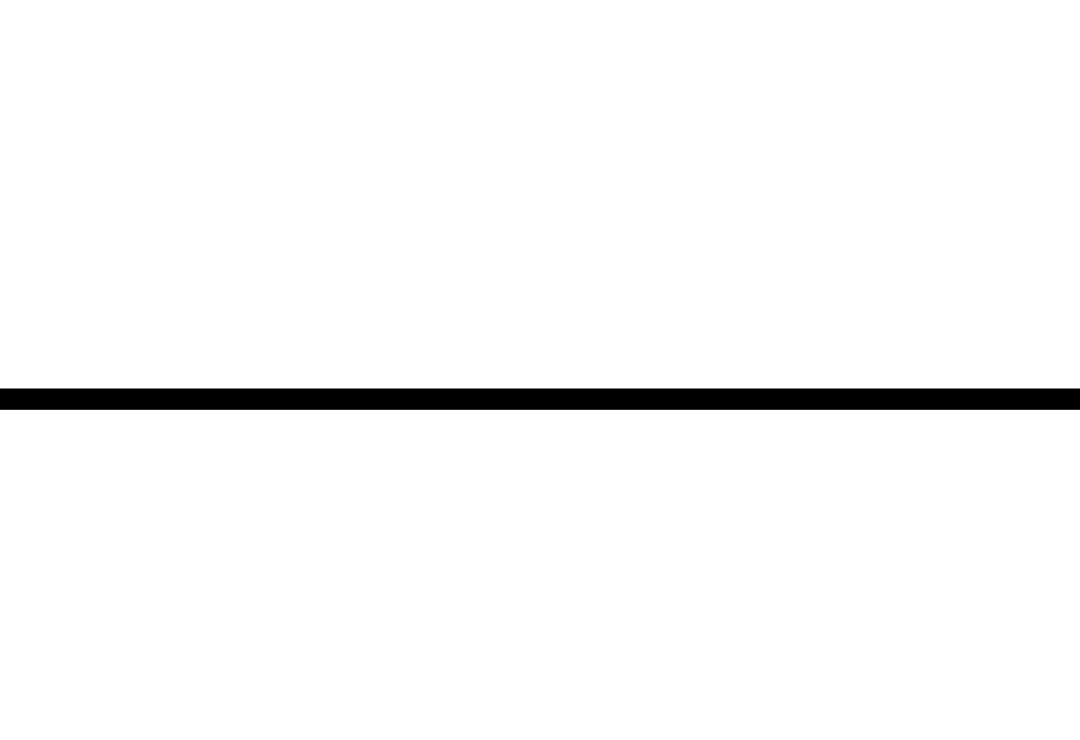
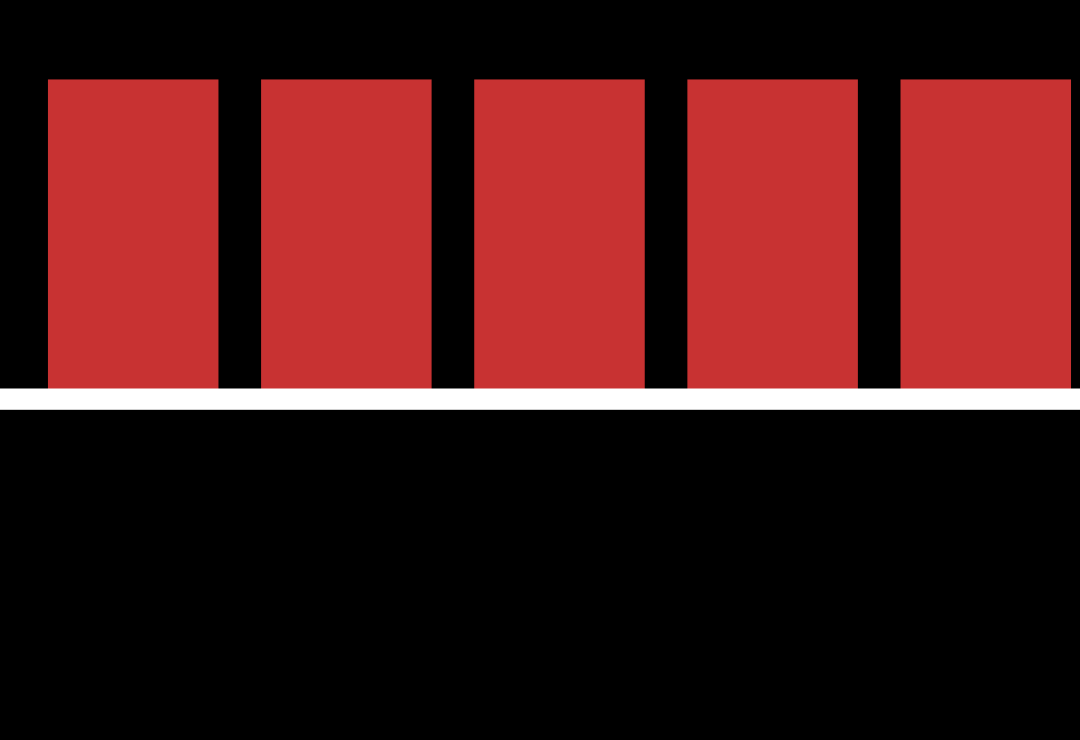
part: none -> (559, 239)

